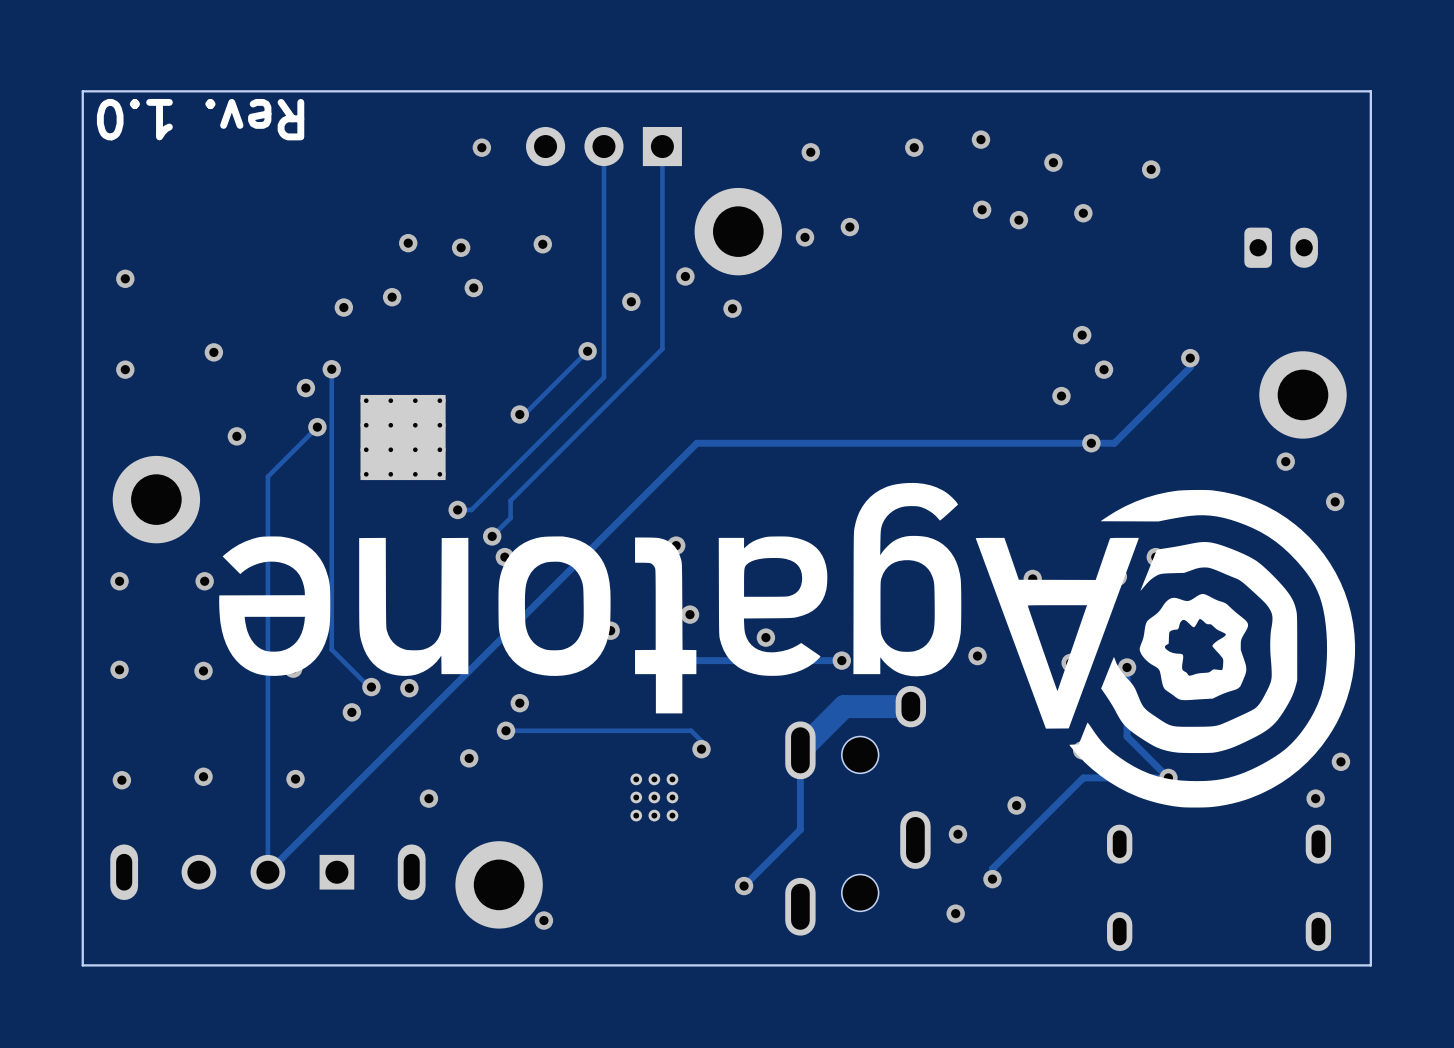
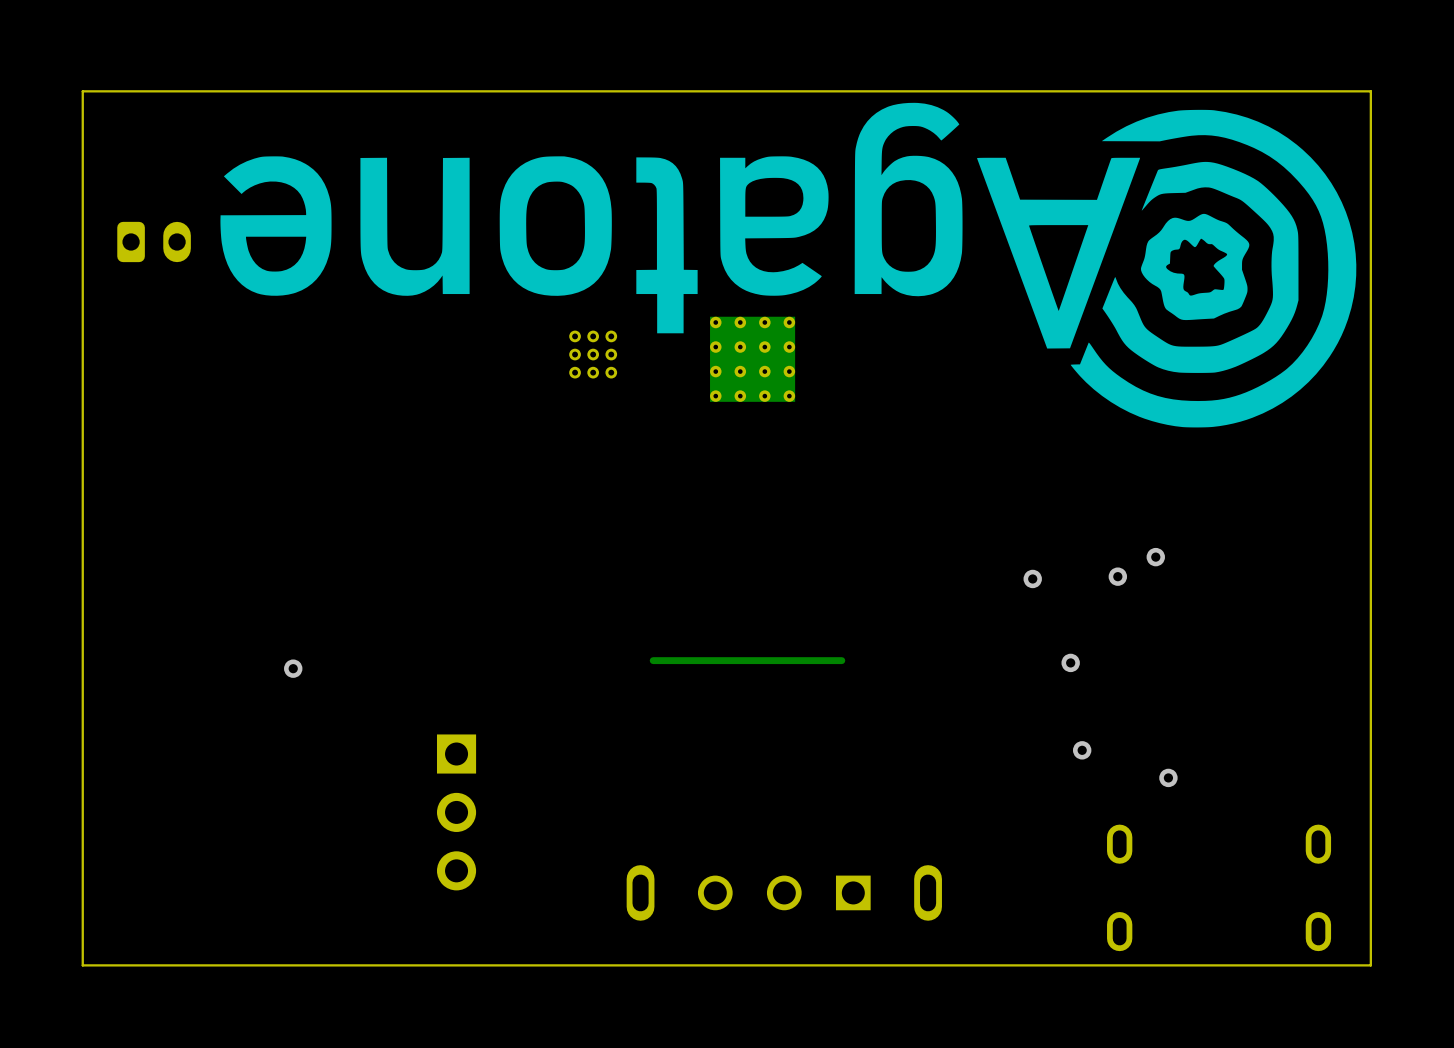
text: Rev. 1.0 (200, 119) -> none
via: (980, 139) -> none
track: (603, 146) (603, 377) (471, 509) (457, 509) -> none
part: (603, 146) -> none
track: (662, 146) (662, 348) (510, 500) (510, 518) (492, 536) -> none
via: (481, 147) -> none
via: (914, 147) -> none
via: (810, 152) -> none
via: (1053, 162) -> none
via: (1151, 169) -> none
via: (982, 209) -> none
via: (1083, 213) -> none
via: (1018, 220) -> none
via: (849, 227) -> none
part: (738, 231) -> none
via: (805, 237) -> none
part: none -> (154, 241)
via: (408, 243) -> none
via: (542, 244) -> none
via: (461, 247) -> none
part: (1281, 247) -> none
via: (685, 276) -> none
via: (125, 278) -> none
via: (473, 287) -> none
via: (392, 297) -> none
via: (631, 301) -> none
via: (343, 307) -> none
via: (732, 308) -> none
via: (1082, 335) -> none
track: (591, 347) (524, 414) (519, 414) -> none
via: (587, 351) -> none
via: (213, 352) -> none
track: (1190, 358) (1190, 367) (1114, 443) (696, 443) (267, 872) (267, 476) (317, 427) -> none
via: (1190, 358) -> none
via: (125, 369) -> none
track: (331, 369) (331, 649) (369, 687) (371, 687) -> none
via: (331, 369) -> none
via: (1104, 369) -> none
via: (305, 388) -> none
part: (1302, 394) -> none
via: (1061, 396) -> none
via: (519, 414) -> none
via: (317, 427) -> none
via: (236, 436) -> none
part position: (403, 437) -> (752, 359)
via: (1091, 443) -> none
via: (1285, 461) -> none
part: (156, 499) -> none
via: (1335, 501) -> none
via: (457, 509) -> none
via: (492, 536) -> none
via: (676, 545) -> none
via: (504, 557) -> none
via: (119, 581) -> none
via: (204, 581) -> none
via: (690, 614) -> none
via: (610, 630) -> none
via: (765, 637) -> none
drawing position: (787, 645) -> (788, 265)
via: (977, 656) -> none
via: (841, 660) -> none
track: (1127, 667) (1127, 736) (1168, 777) (1083, 777) (992, 868) (992, 879) -> none
via: (1127, 667) -> none
via: (119, 669) -> none
via: (203, 670) -> none
via: (371, 687) -> none
via: (409, 688) -> none
via: (519, 703) -> none
track: (910, 706) (844, 706) (800, 750) (800, 829) (744, 886) -> none
via: (351, 712) -> none
track: (505, 730) (691, 730) (701, 741) (701, 749) -> none
via: (505, 730) -> none
via: (701, 749) -> none
via: (469, 758) -> none
via: (1340, 761) -> none
via: (203, 776) -> none
via: (295, 779) -> none
via: (121, 780) -> none
part position: (654, 797) -> (593, 354)
via: (428, 798) -> none
via: (1315, 798) -> none
via: (1016, 805) -> none
part: (857, 810) -> none
part: none -> (456, 812)
via: (957, 834) -> none
part position: (267, 872) -> (784, 892)
via: (992, 879) -> none
part: (499, 884) -> none
via: (744, 886) -> none
via: (955, 913) -> none
via: (543, 920) -> none

